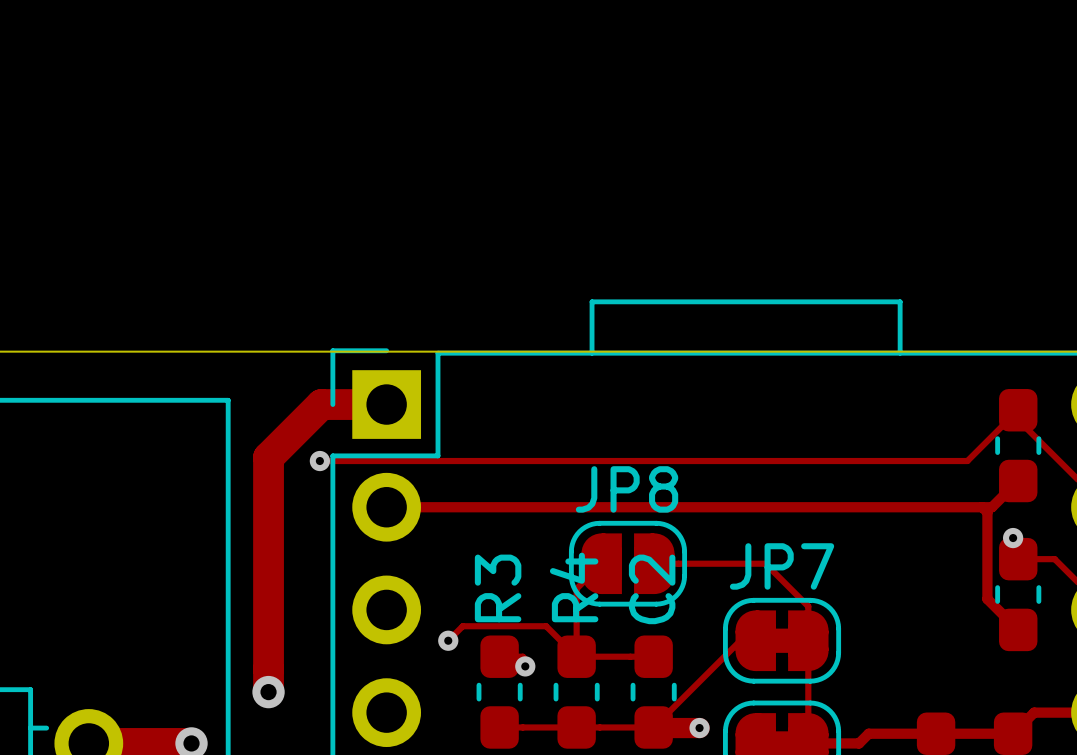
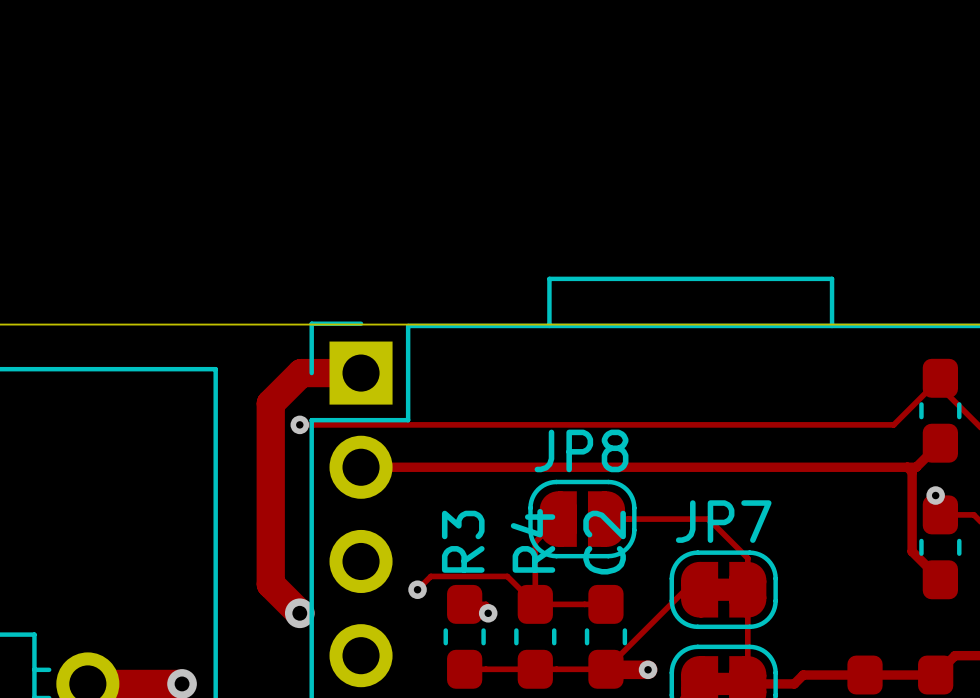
track: (288, 437) (268, 457) (268, 692) -> (270, 403) (270, 584) (299, 613)
via position: (268, 692) -> (299, 613)

